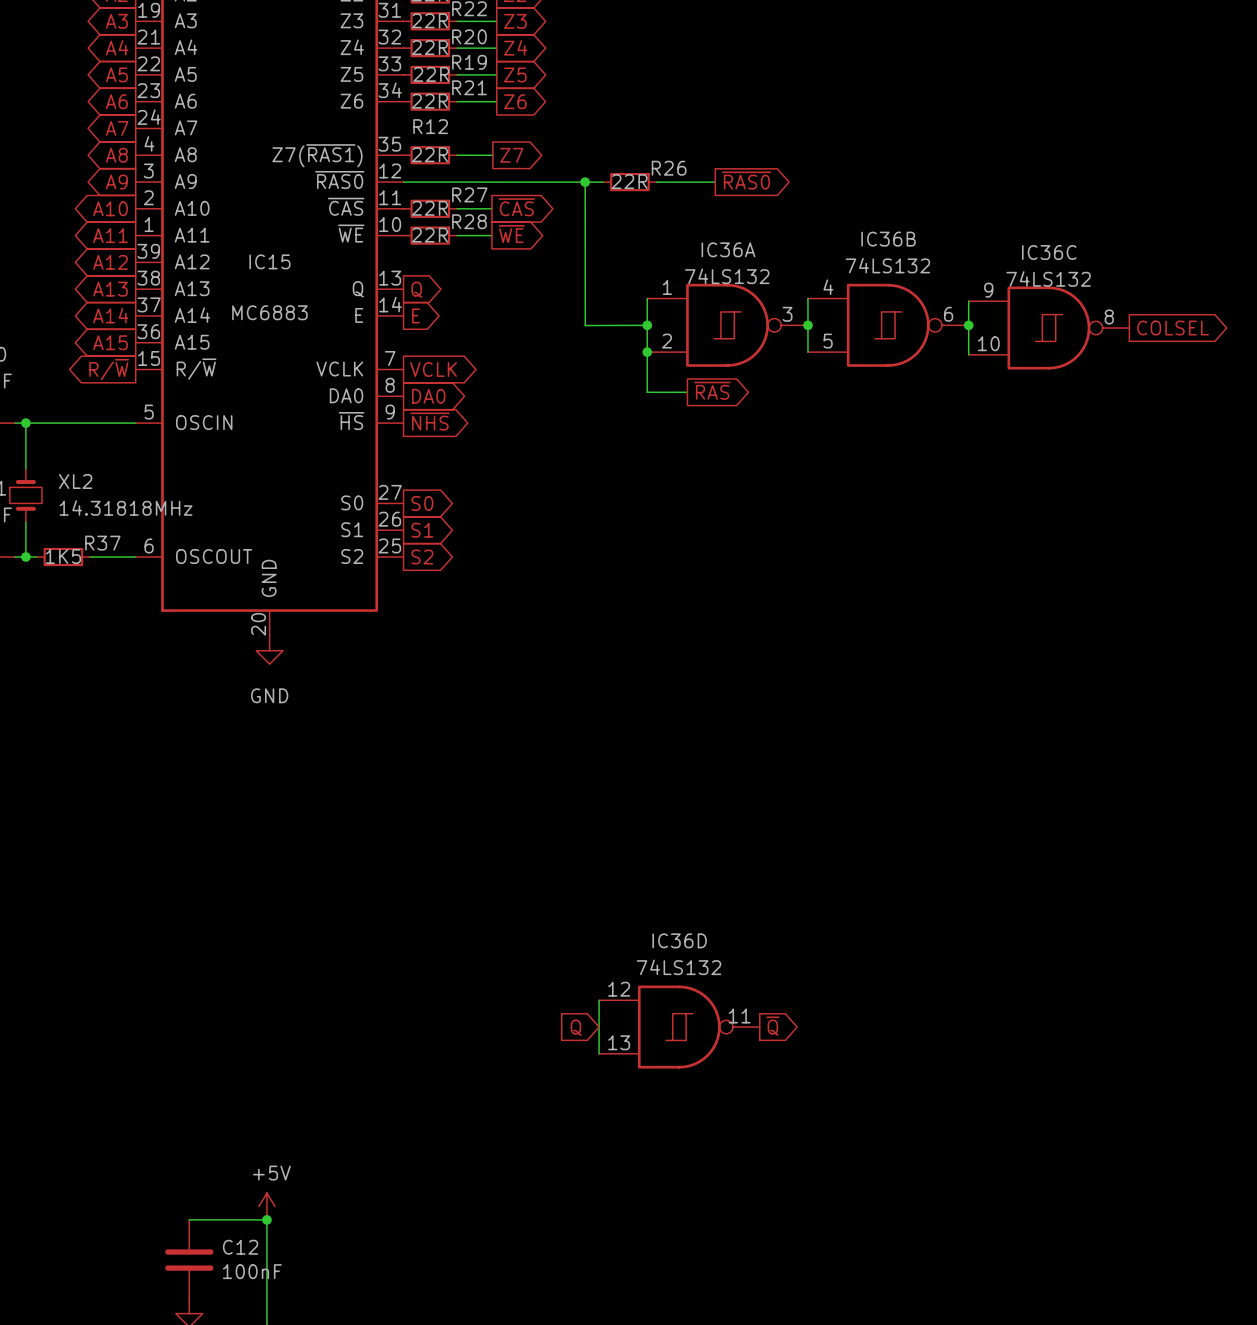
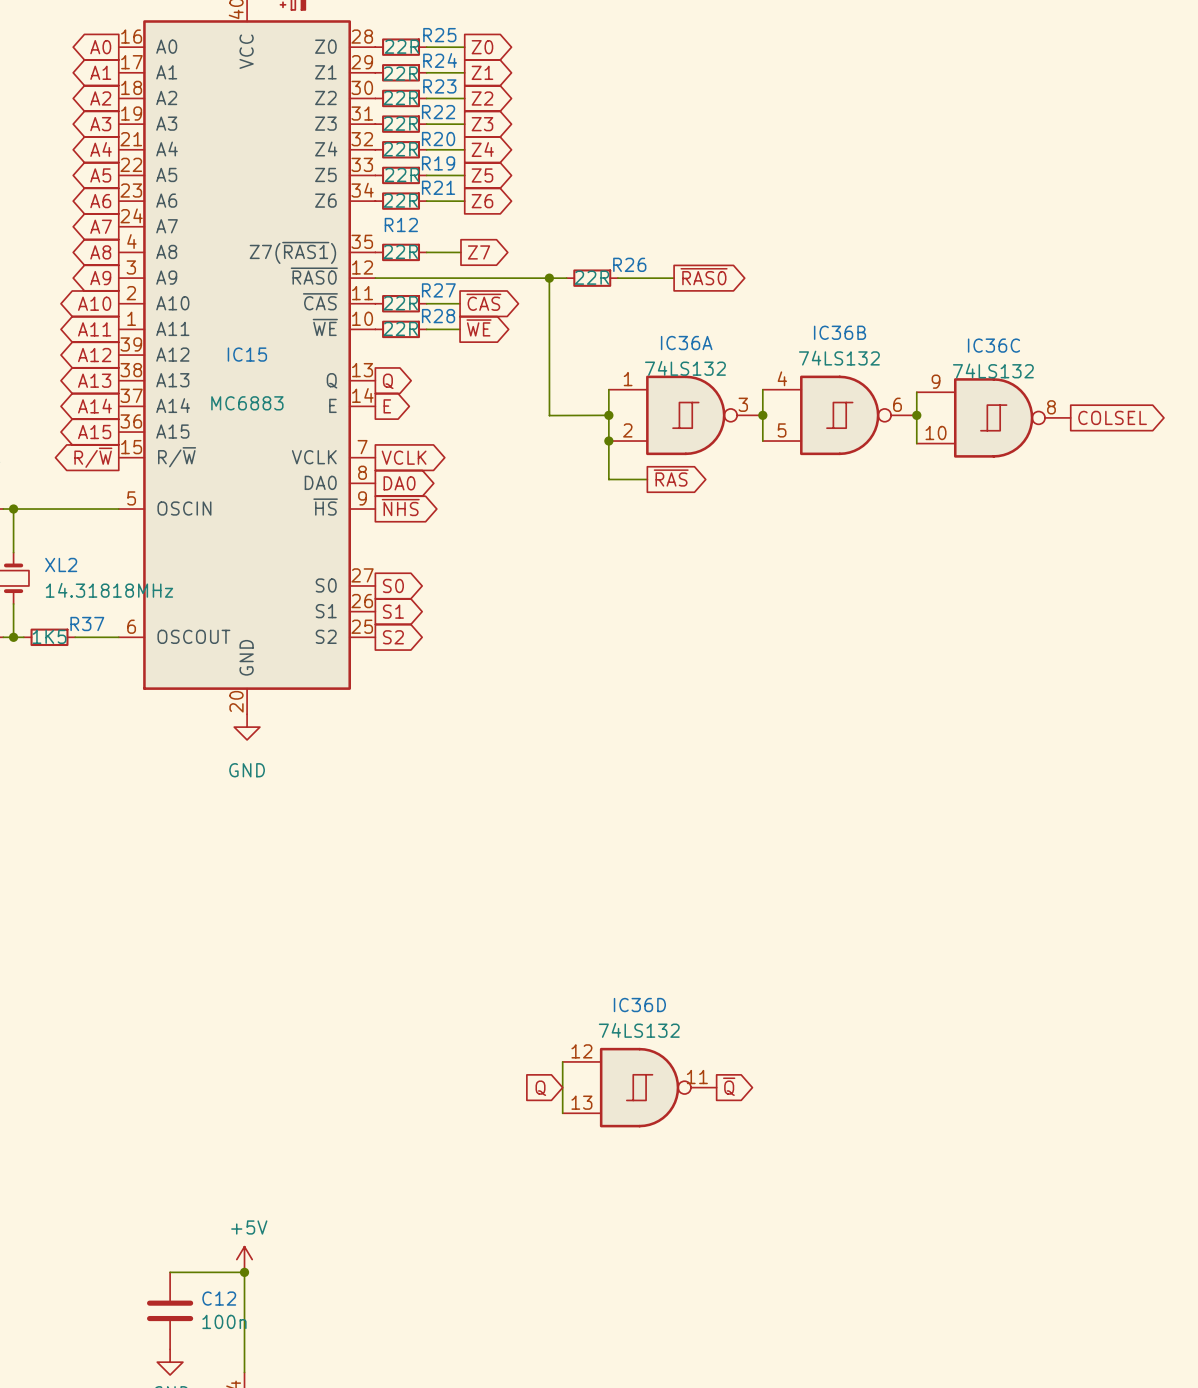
C12 value: 100nF (252, 1271) -> 100n (224, 1321)

